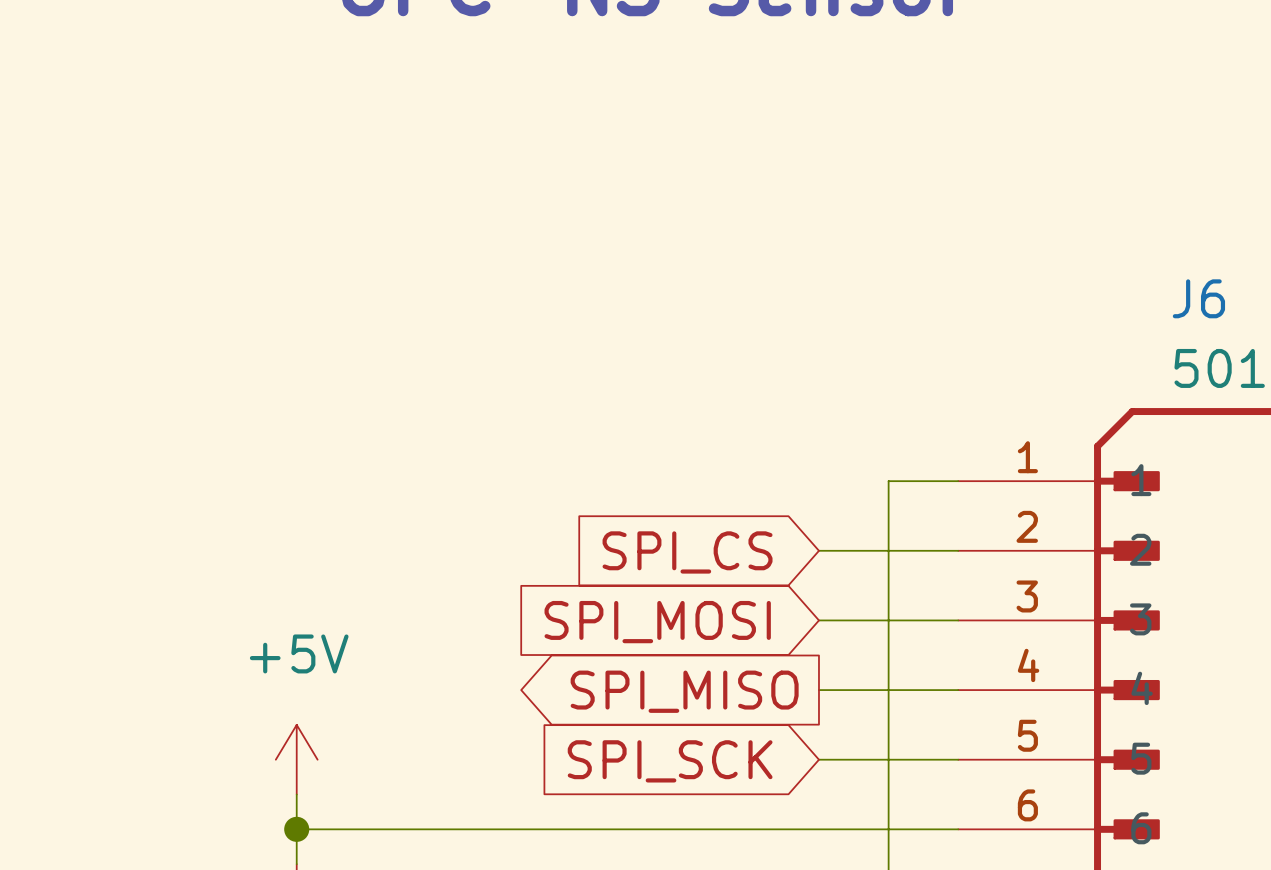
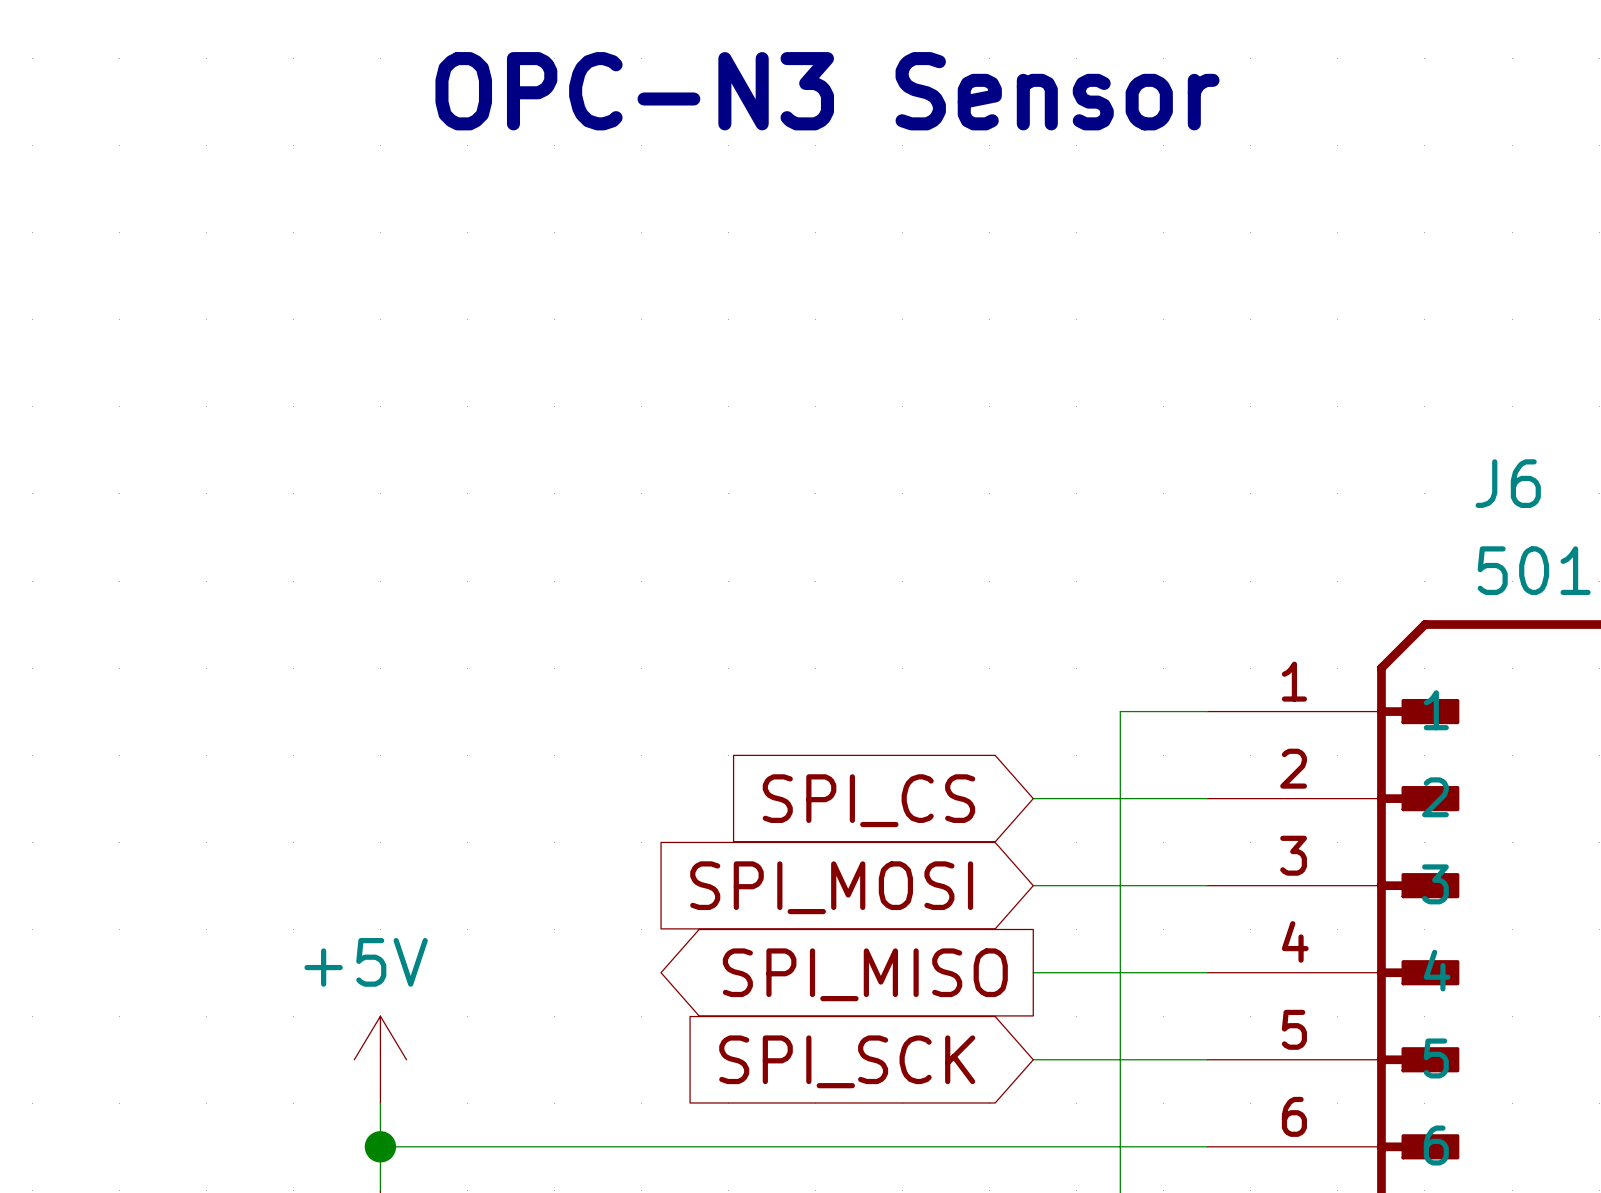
power symbol text position: +5V (299, 653) -> +5V (366, 962)

